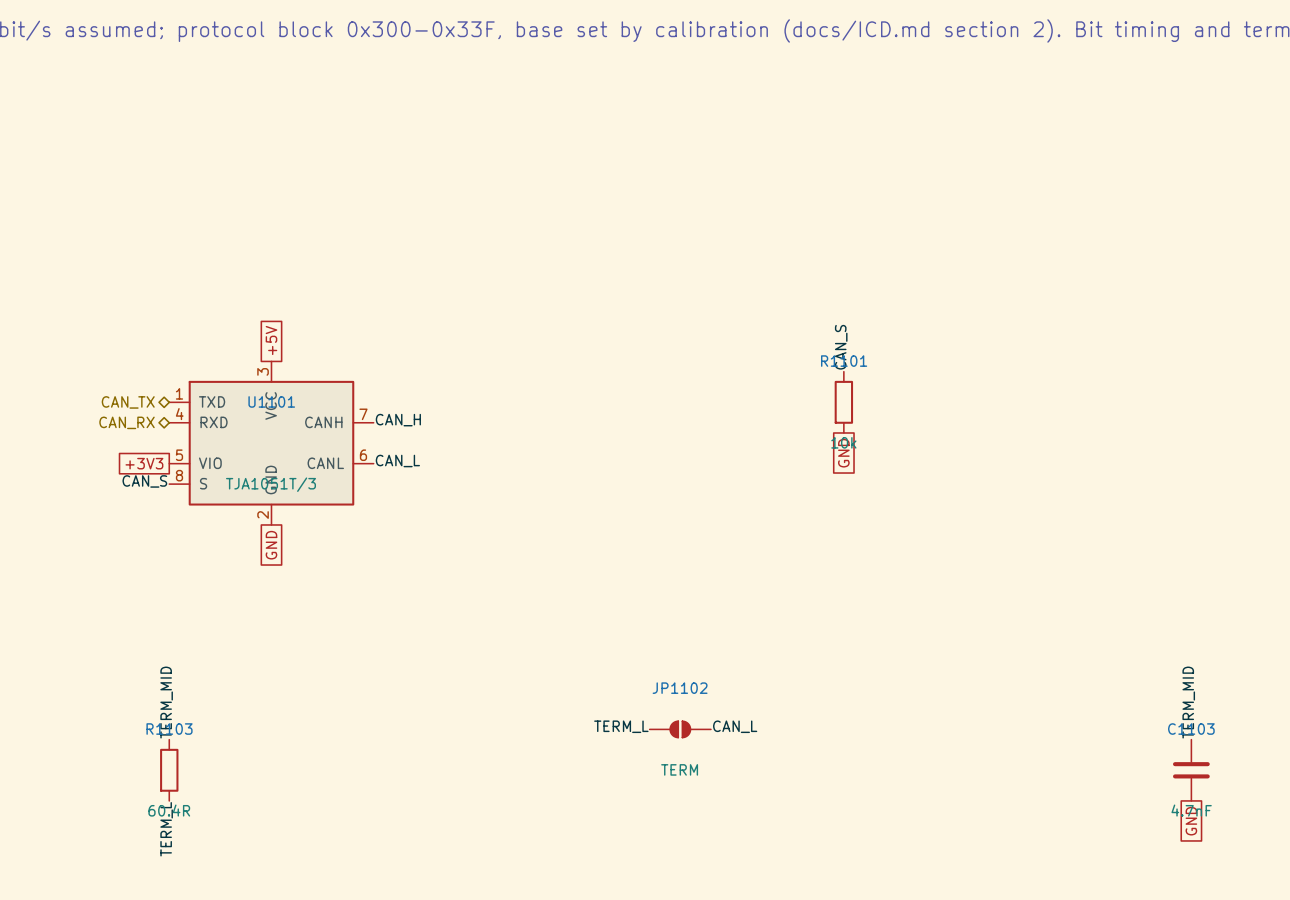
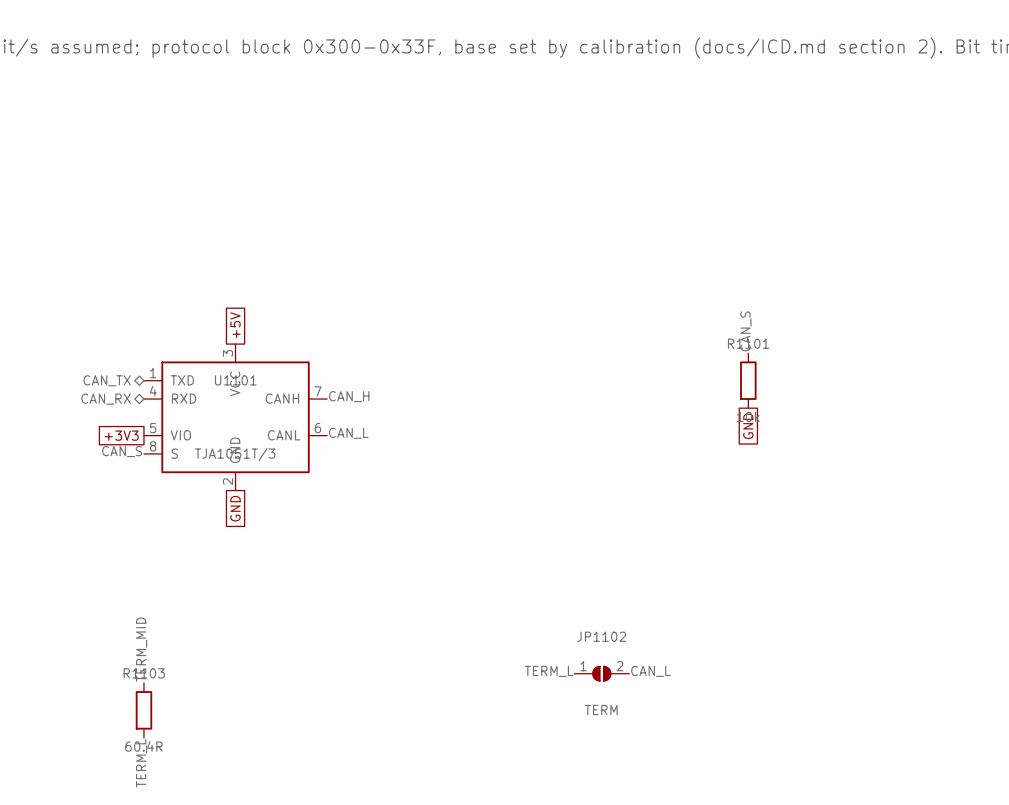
JP1102 pin number: none -> 1 (583, 666)
JP1102 pin number: none -> 2 (619, 666)

